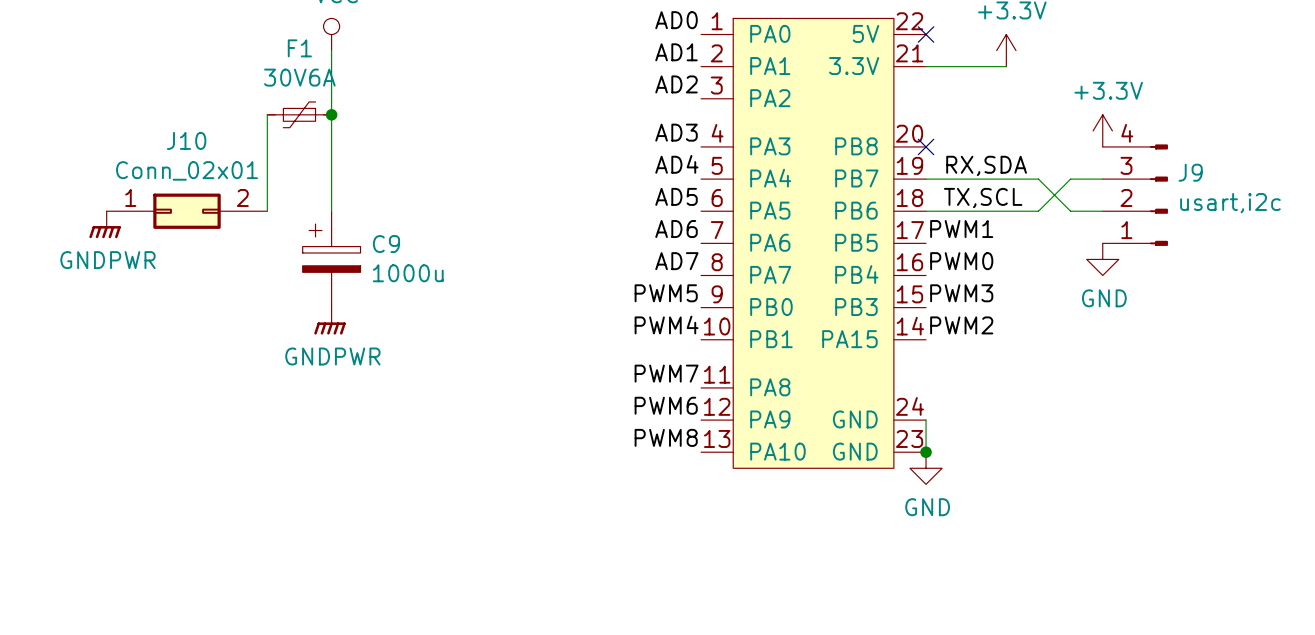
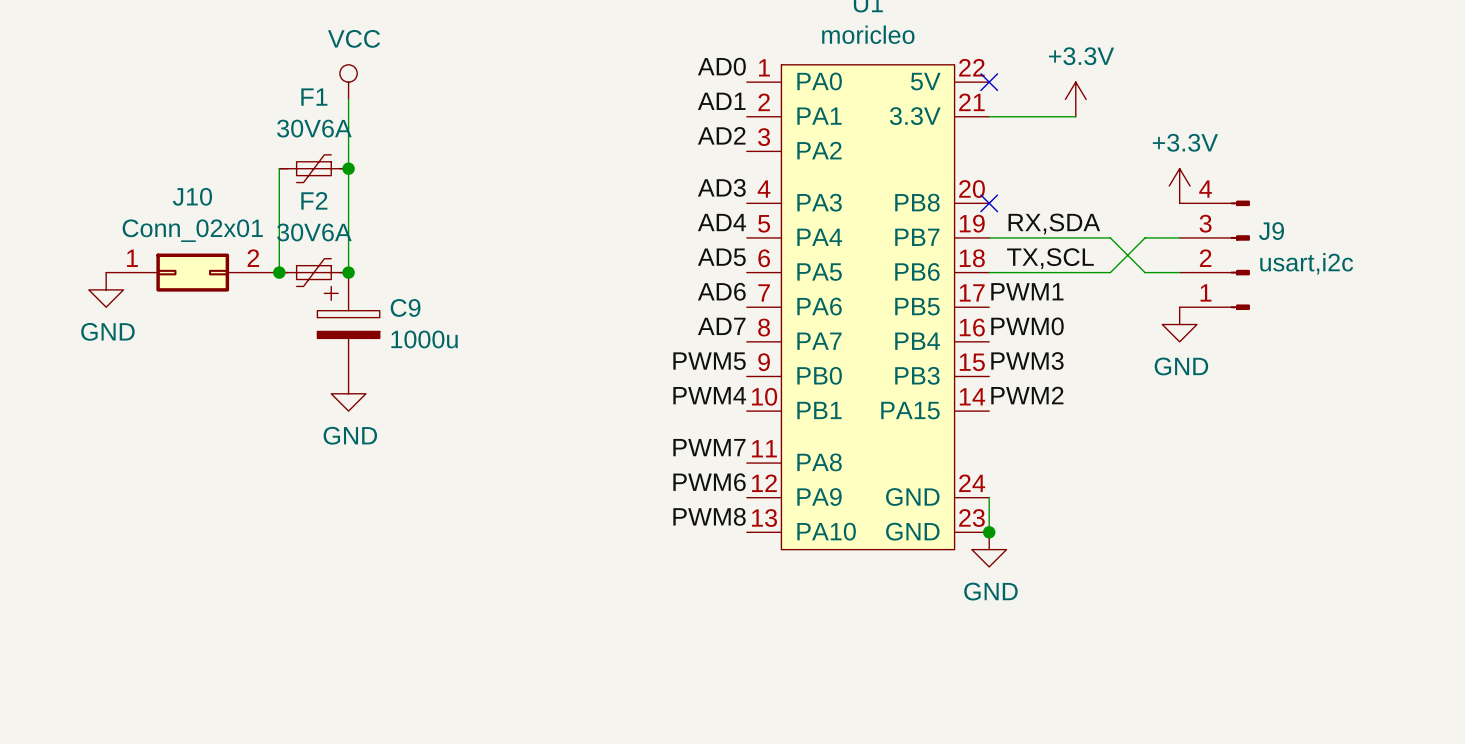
junction: none -> (279, 272)
F2: none -> 30V6A (313, 272)
junction: none -> (348, 272)
power symbol: GNDPWR (105, 224) -> GND (106, 289)
power symbol: GNDPWR (329, 321) -> GND (348, 393)

